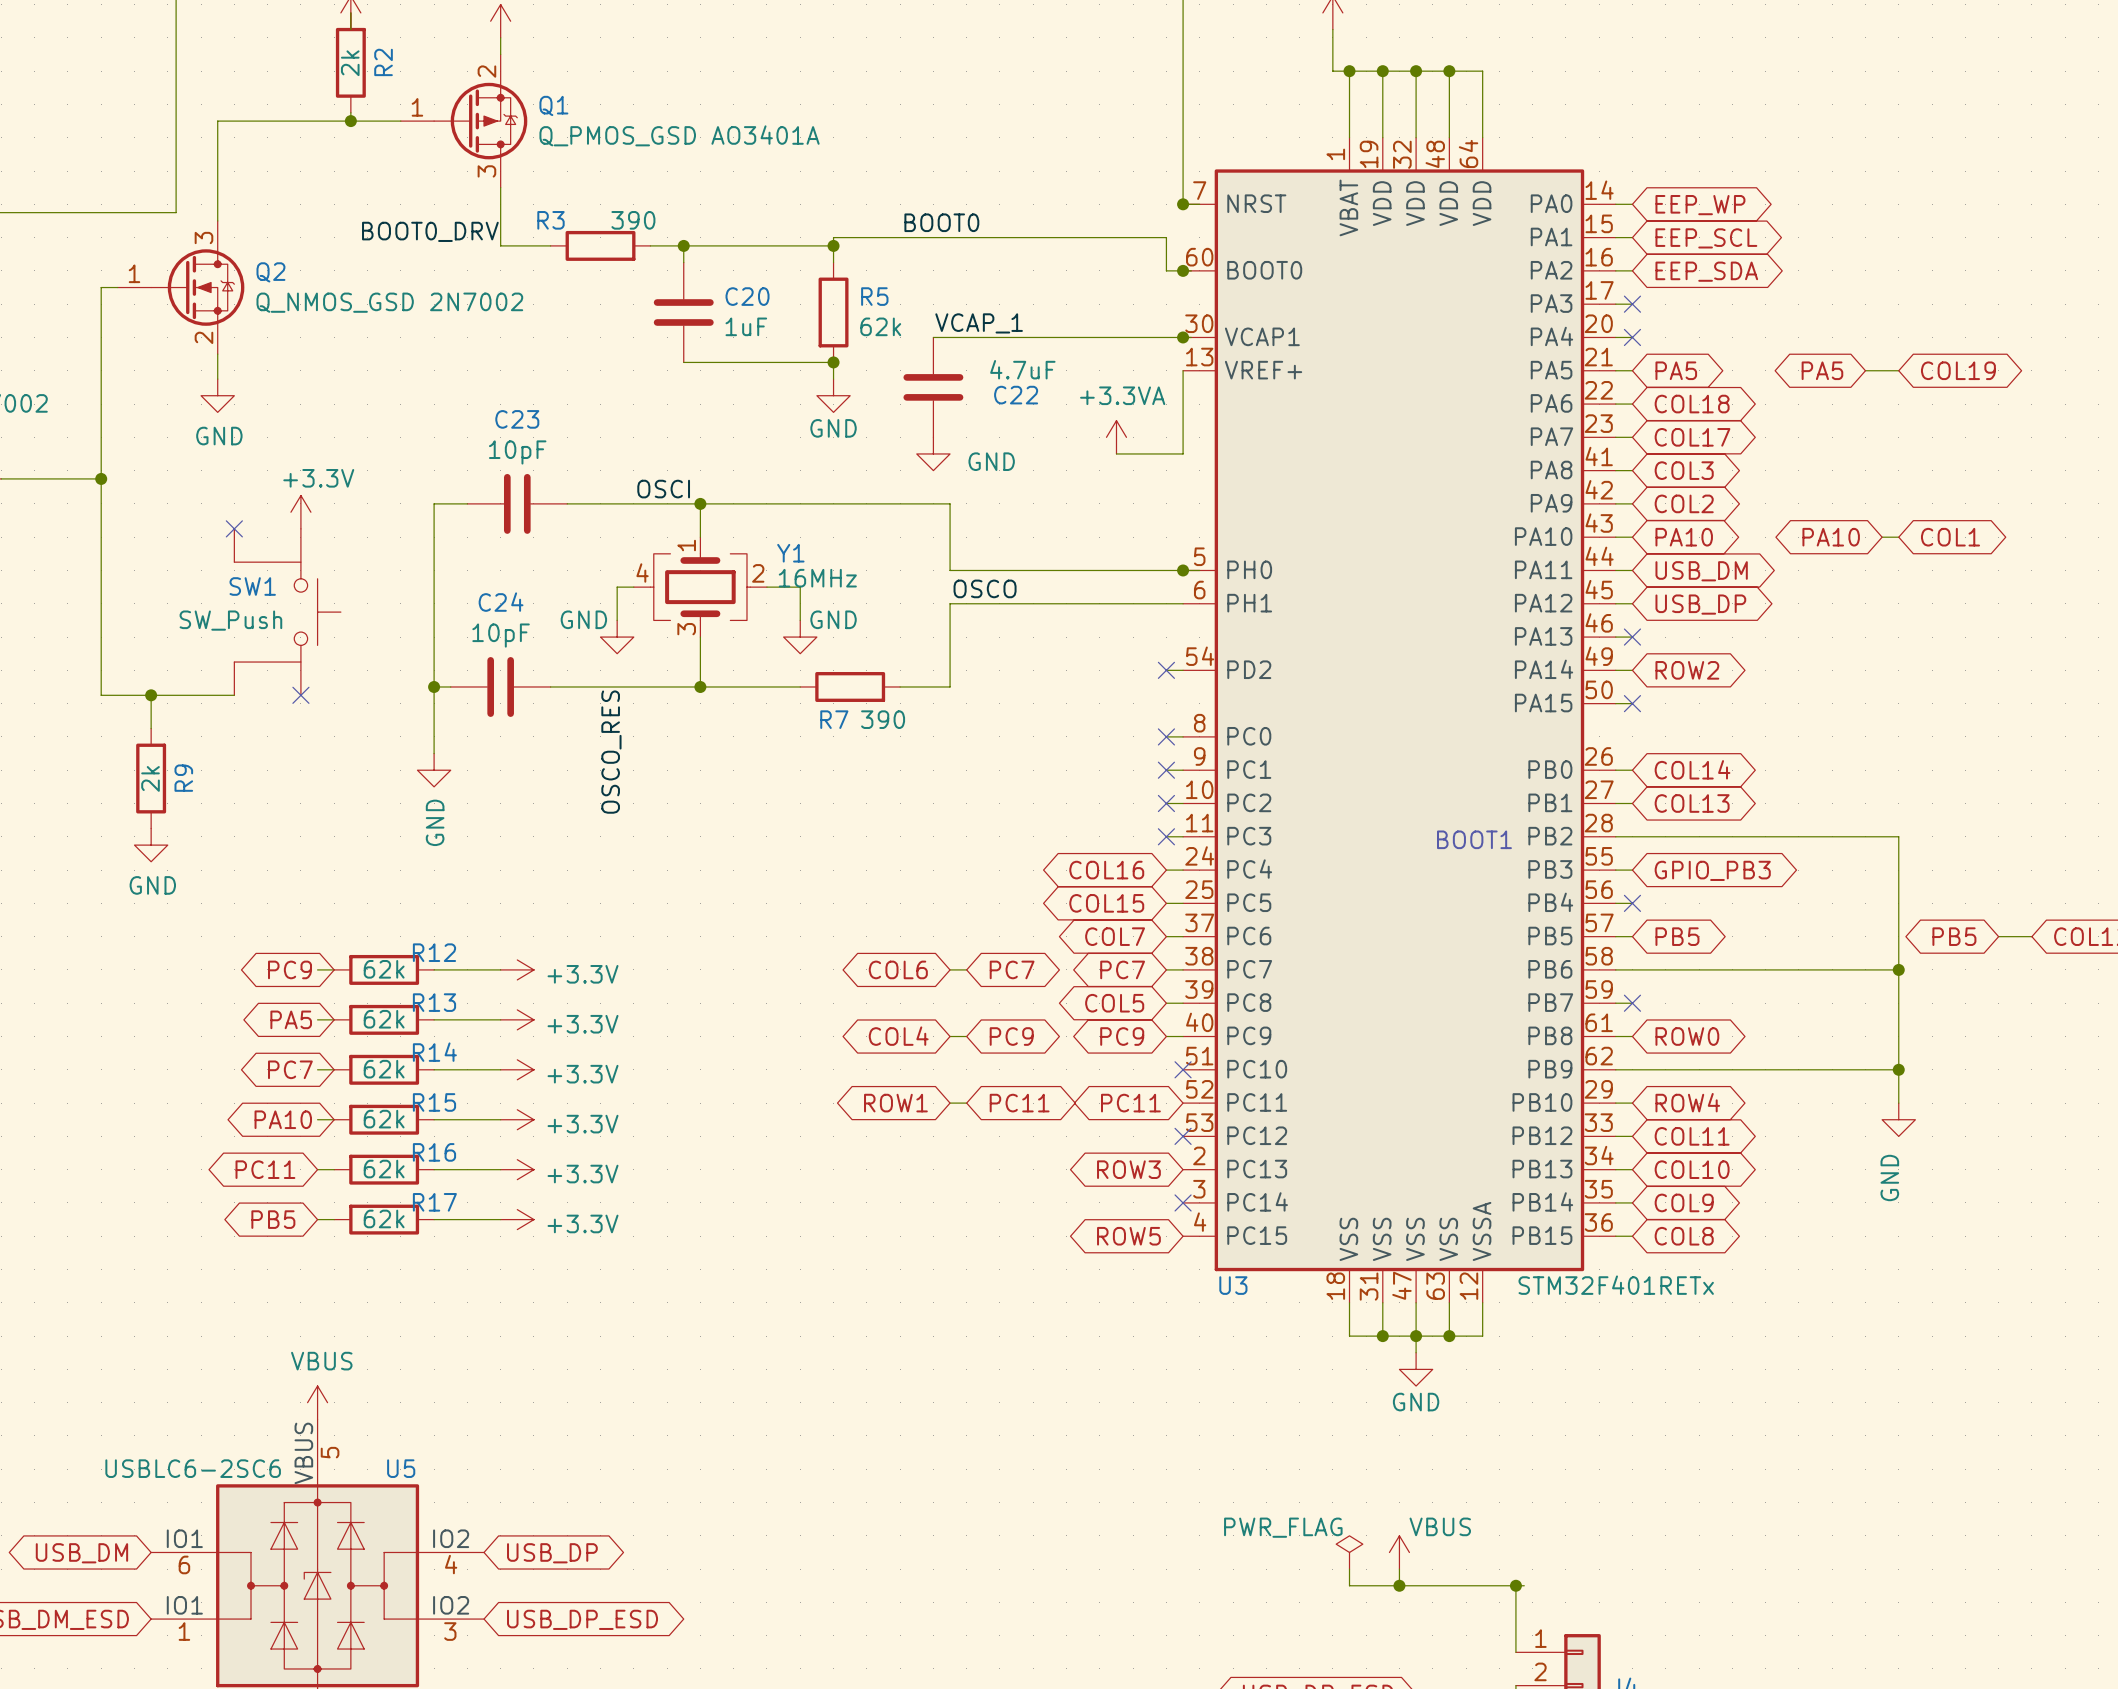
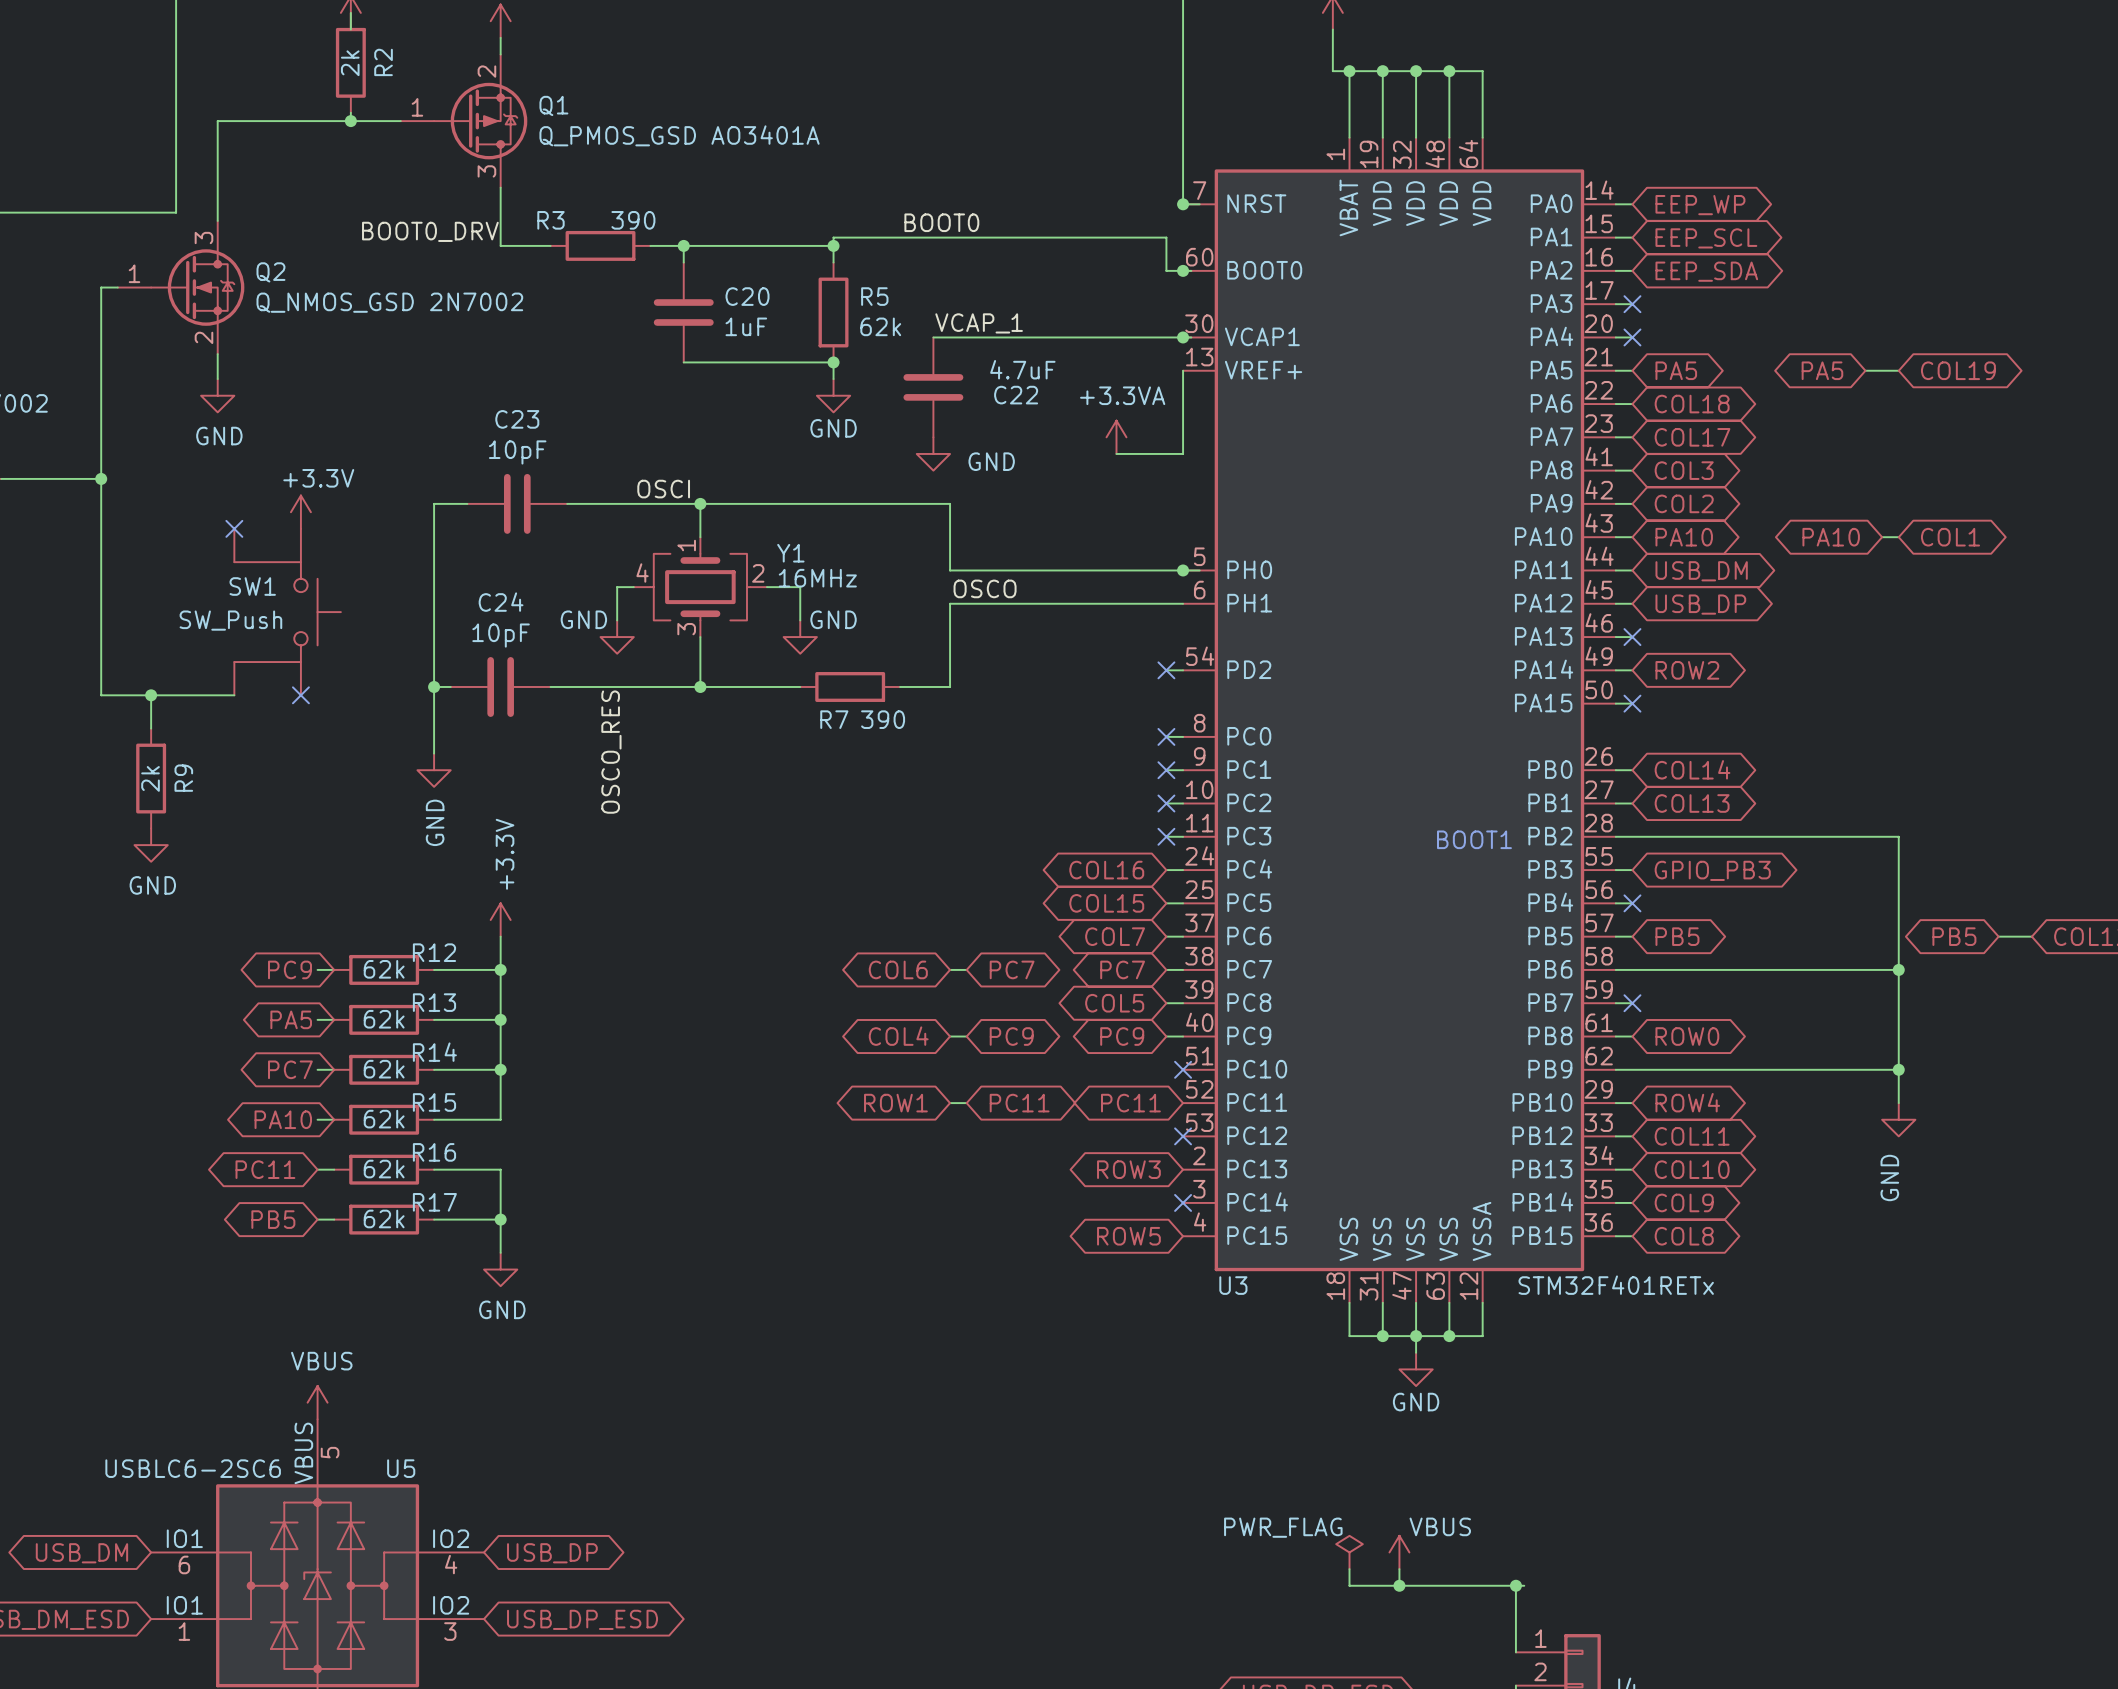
power symbol: none -> +3.3V (500, 920)
wire: none -> (500, 936) (500, 1119)
junction: none -> (500, 969)
power symbol: +3.3V (517, 969) -> none
junction: none -> (500, 1019)
power symbol: +3.3V (517, 1019) -> none
junction: none -> (500, 1069)
power symbol: +3.3V (517, 1069) -> none
power symbol: +3.3V (517, 1119) -> none
wire: none -> (500, 1169) (500, 1252)
power symbol: +3.3V (517, 1169) -> none
junction: none -> (500, 1219)
power symbol: +3.3V (517, 1219) -> none
power symbol: none -> GND (500, 1269)

